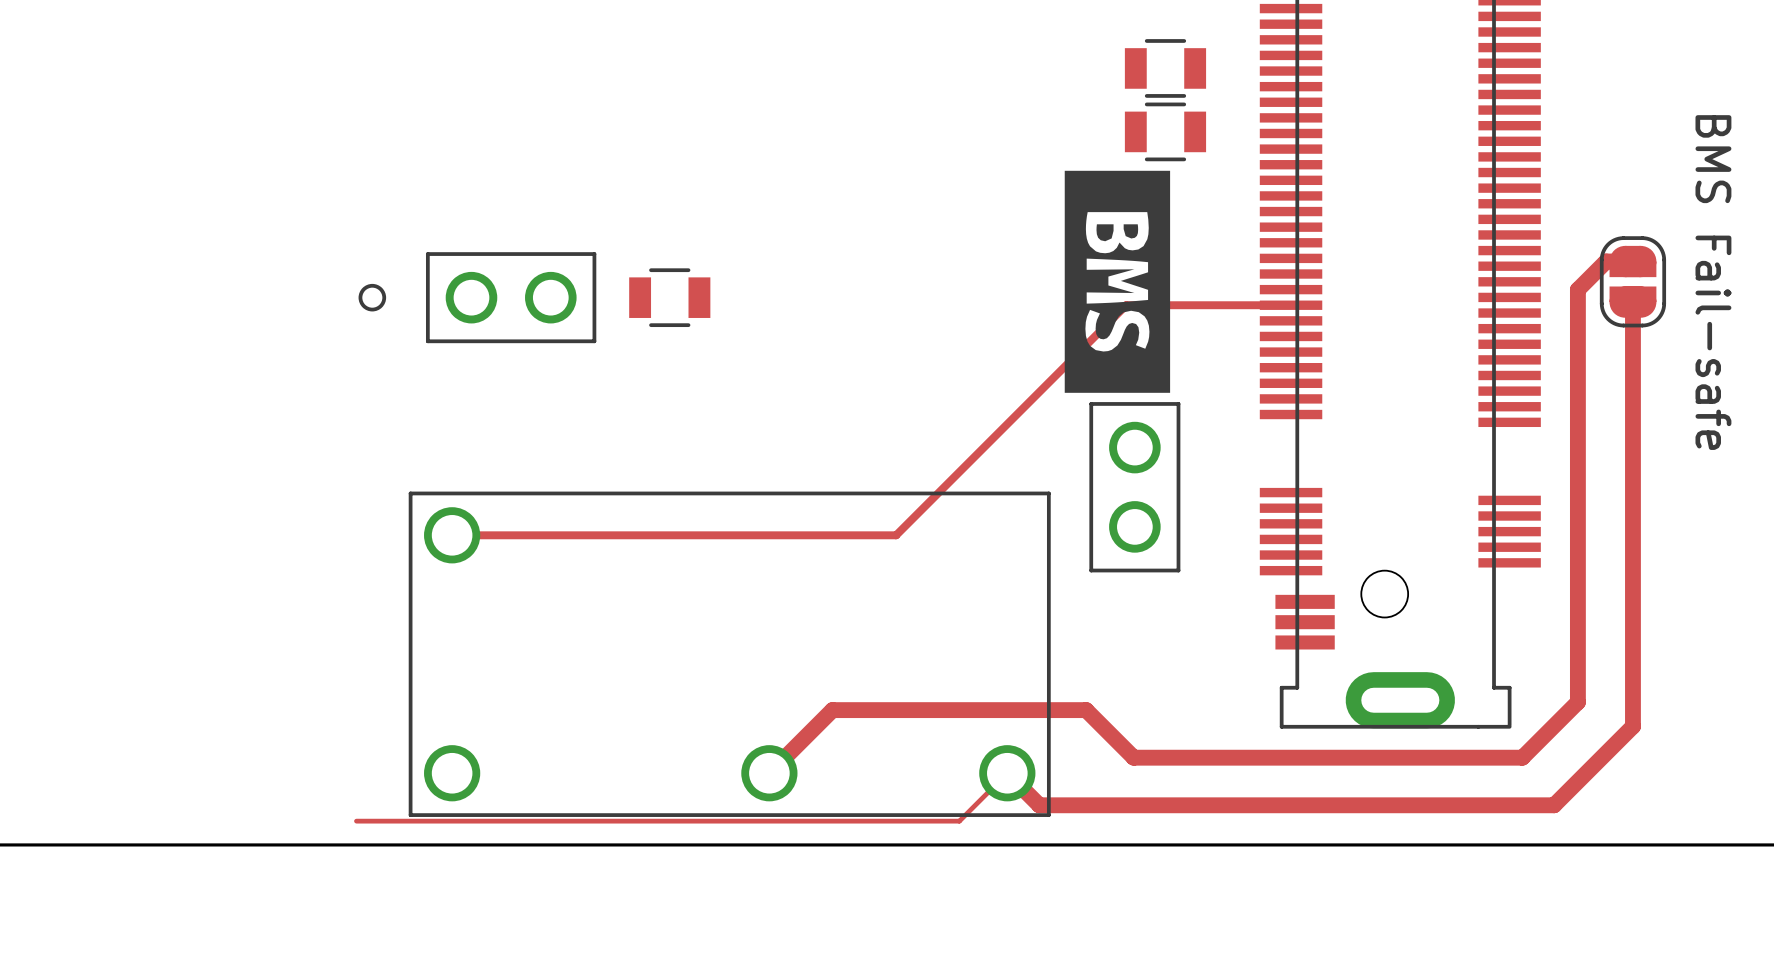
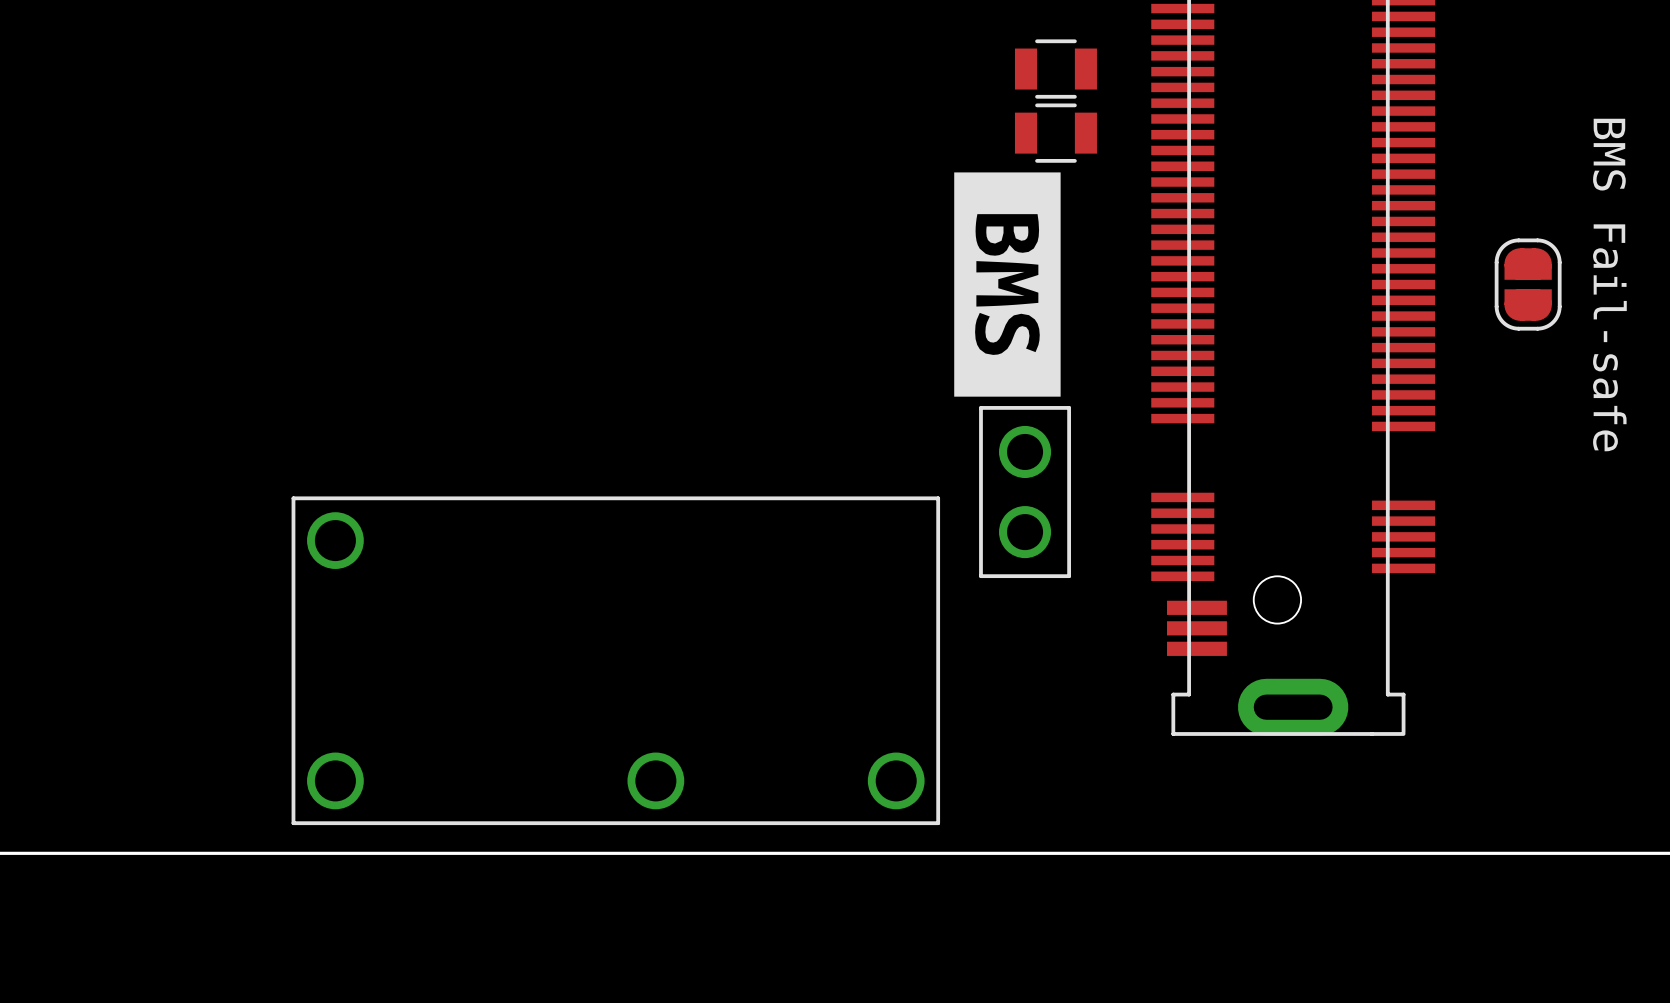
track: (1632, 261) (1606, 261) (1577, 289) (1577, 702) (1522, 757) (1133, 757) (1086, 710) (832, 710) (769, 773) -> none
part: (477, 297) -> none
part: (669, 297) -> none
track: (1632, 302) (1632, 726) (1554, 805) (1039, 805) (1007, 773) (959, 821) (356, 821) -> none
track: (1291, 305) (1126, 305) (896, 535) (452, 535) -> none

